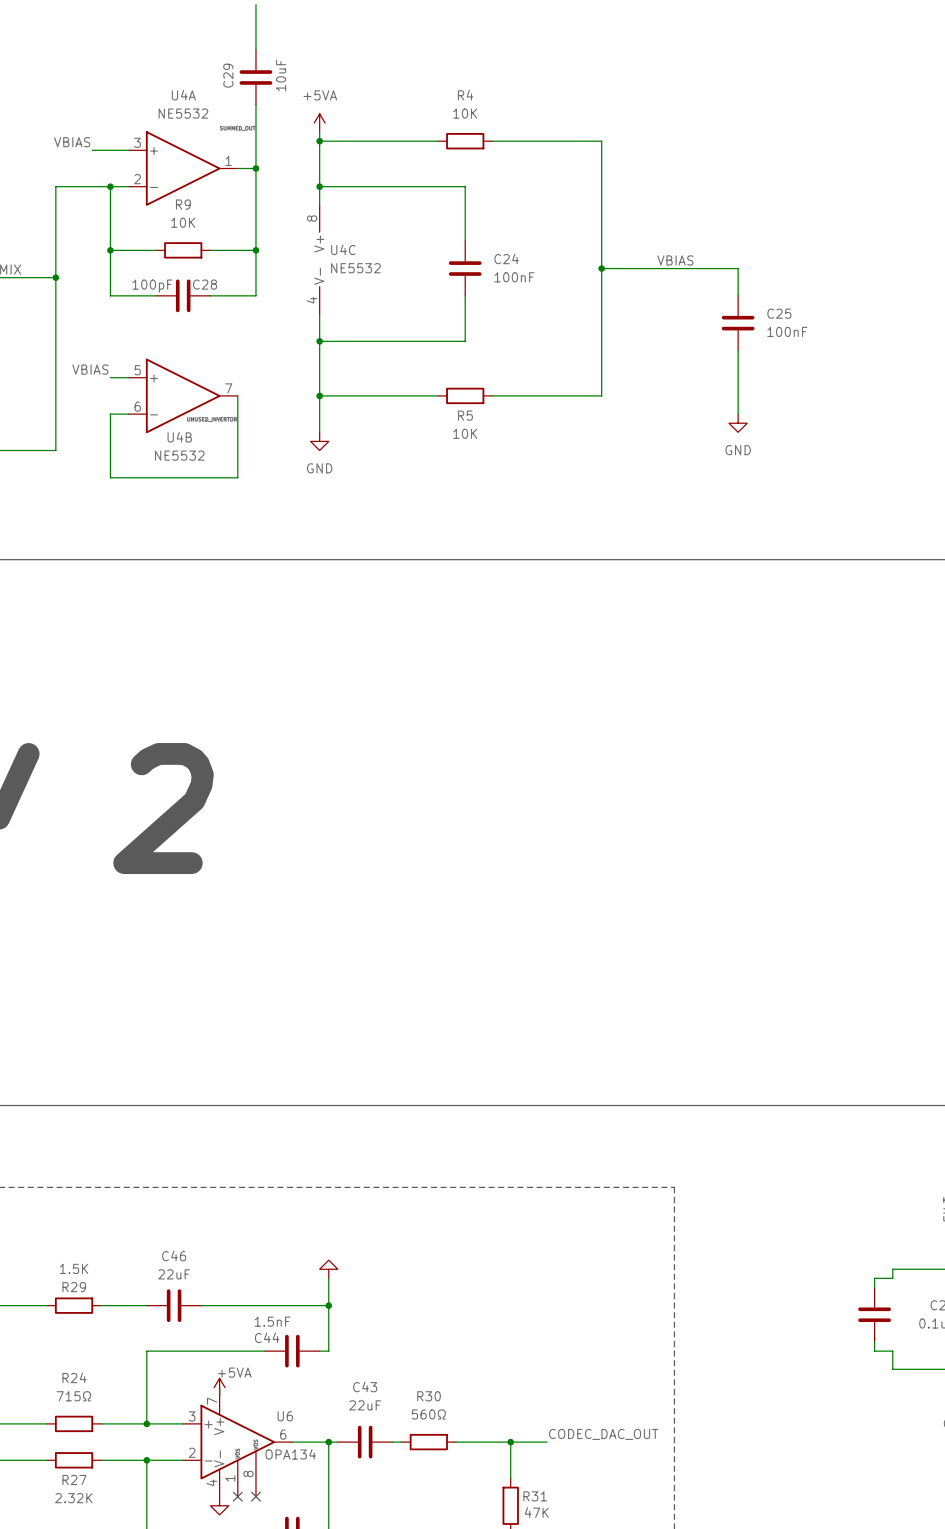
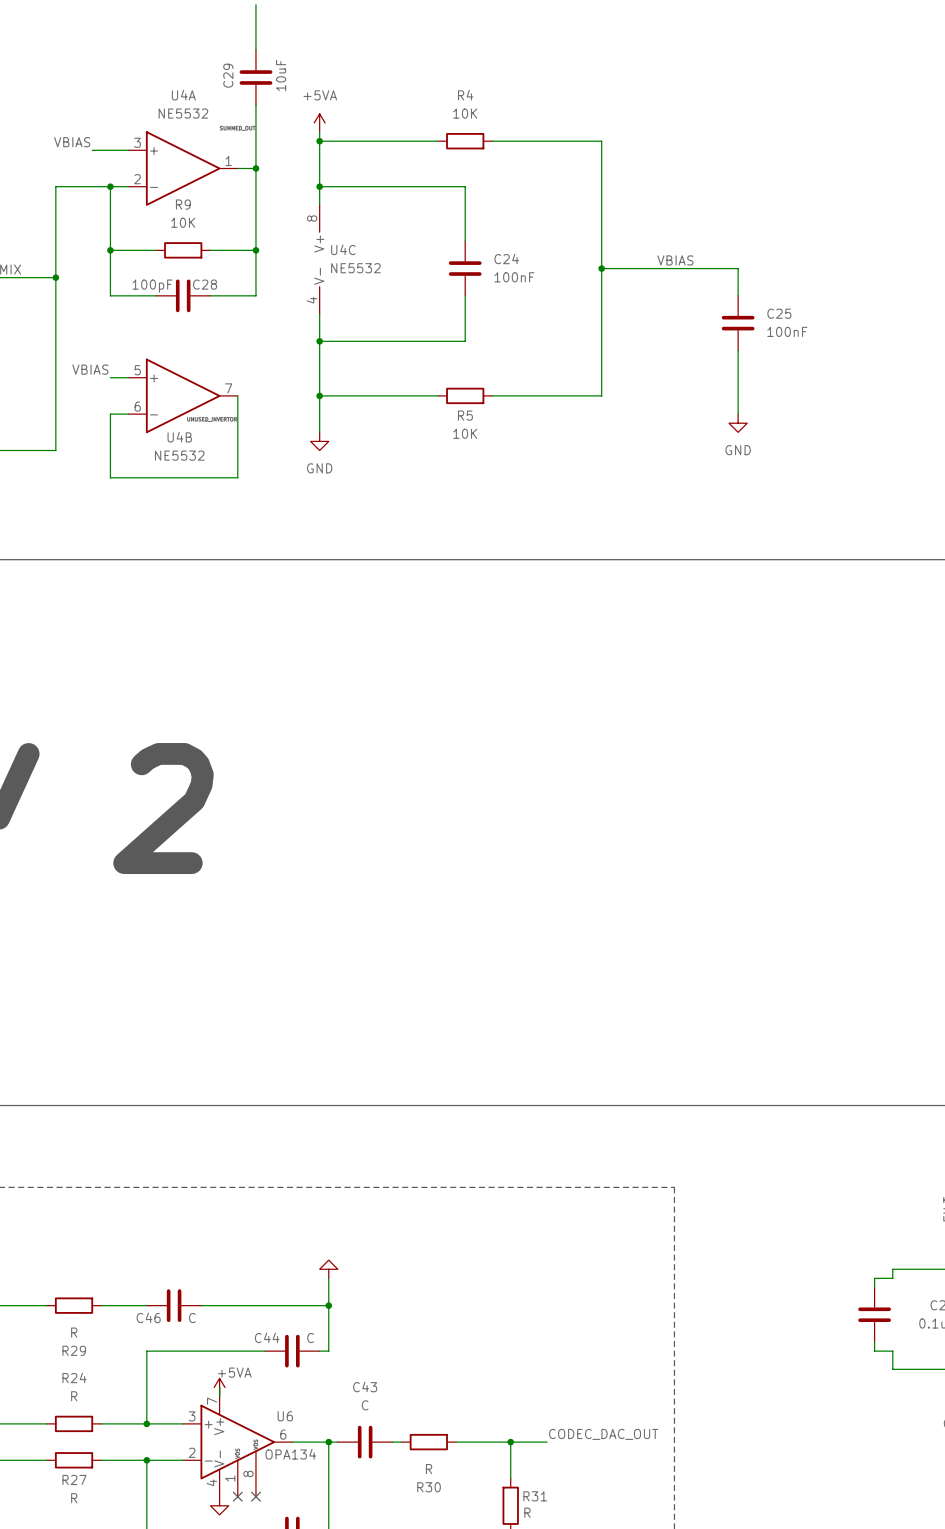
C46 name position: C46 (174, 1255) -> C46 (148, 1317)
R29 value: 1.5K (74, 1268) -> R (74, 1332)
C46 value: 22uF (174, 1274) -> C (192, 1318)
R29 name position: R29 (74, 1287) -> R29 (74, 1350)
C44 value: 1.5nF (272, 1321) -> C (310, 1338)
R24 value: 715Ω (73, 1396) -> R (74, 1396)
R30 name position: R30 (429, 1396) -> R30 (429, 1487)
C43 value: 22uF (365, 1405) -> C (365, 1405)
R30 value: 560Ω (428, 1414) -> R (429, 1469)
R27 value: 2.32K (73, 1498) -> R (74, 1498)
R31 value: 47K (536, 1512) -> R (527, 1512)

